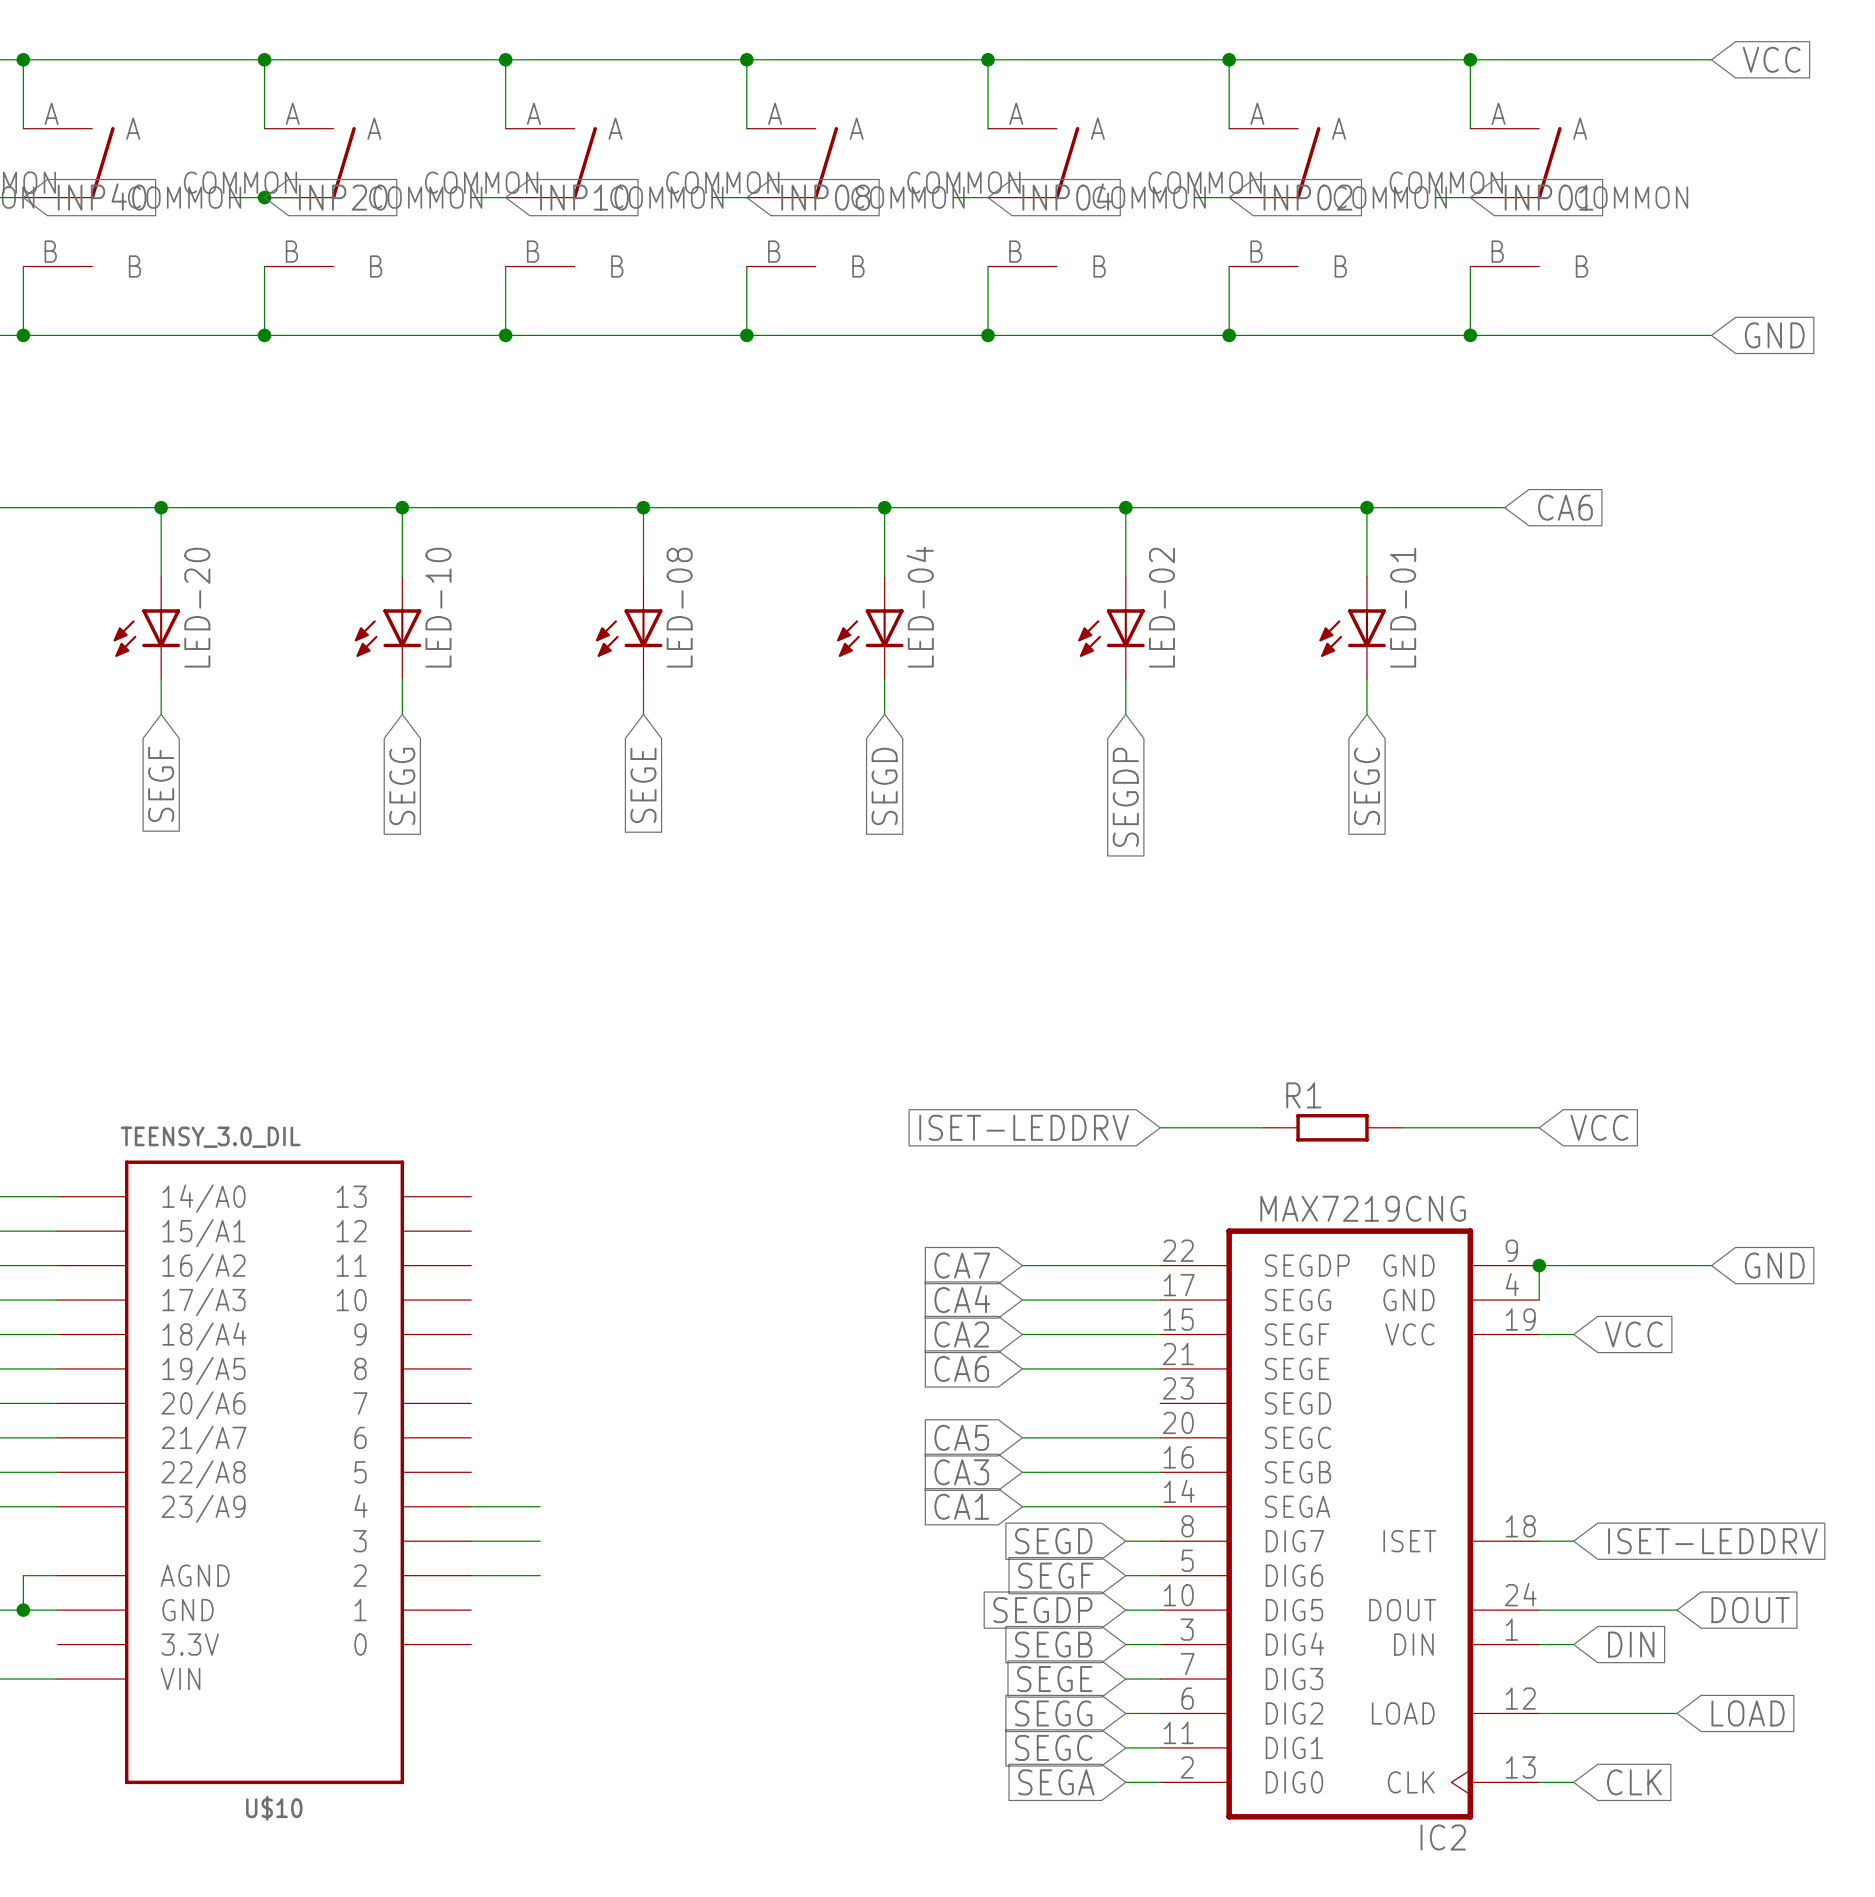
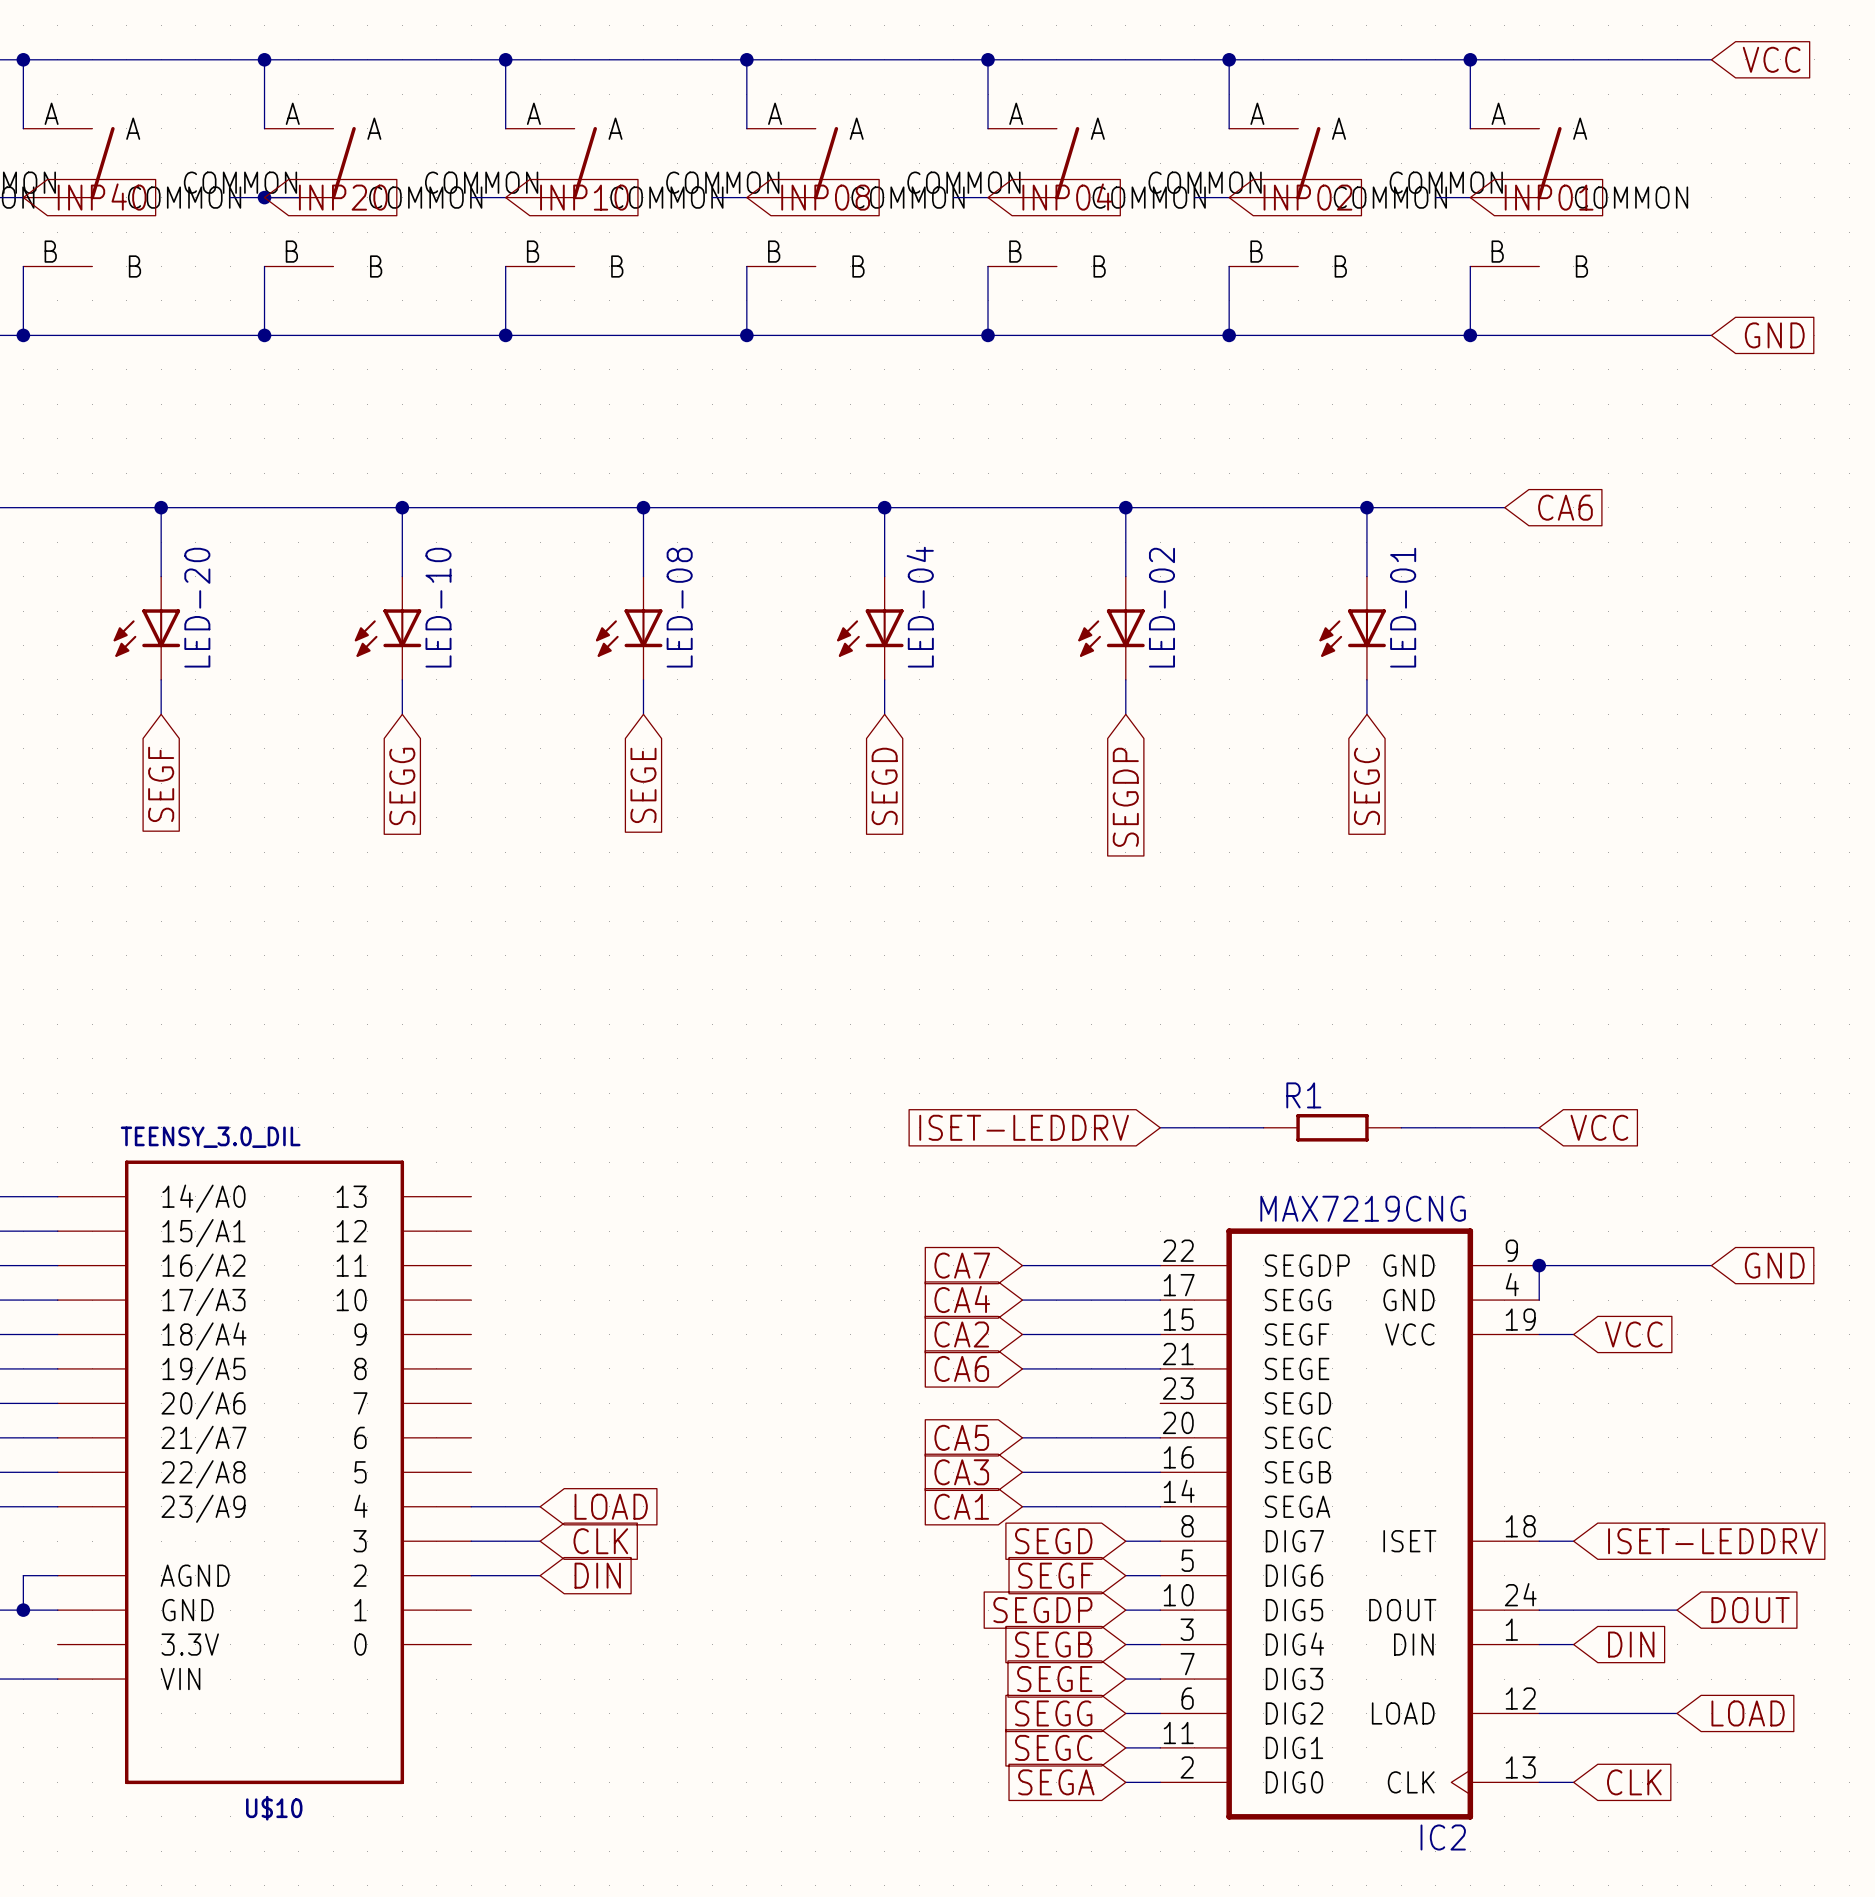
global label: none -> LOAD (611, 1506)
global label: none -> CLK (600, 1541)
global label: none -> DIN (597, 1575)

